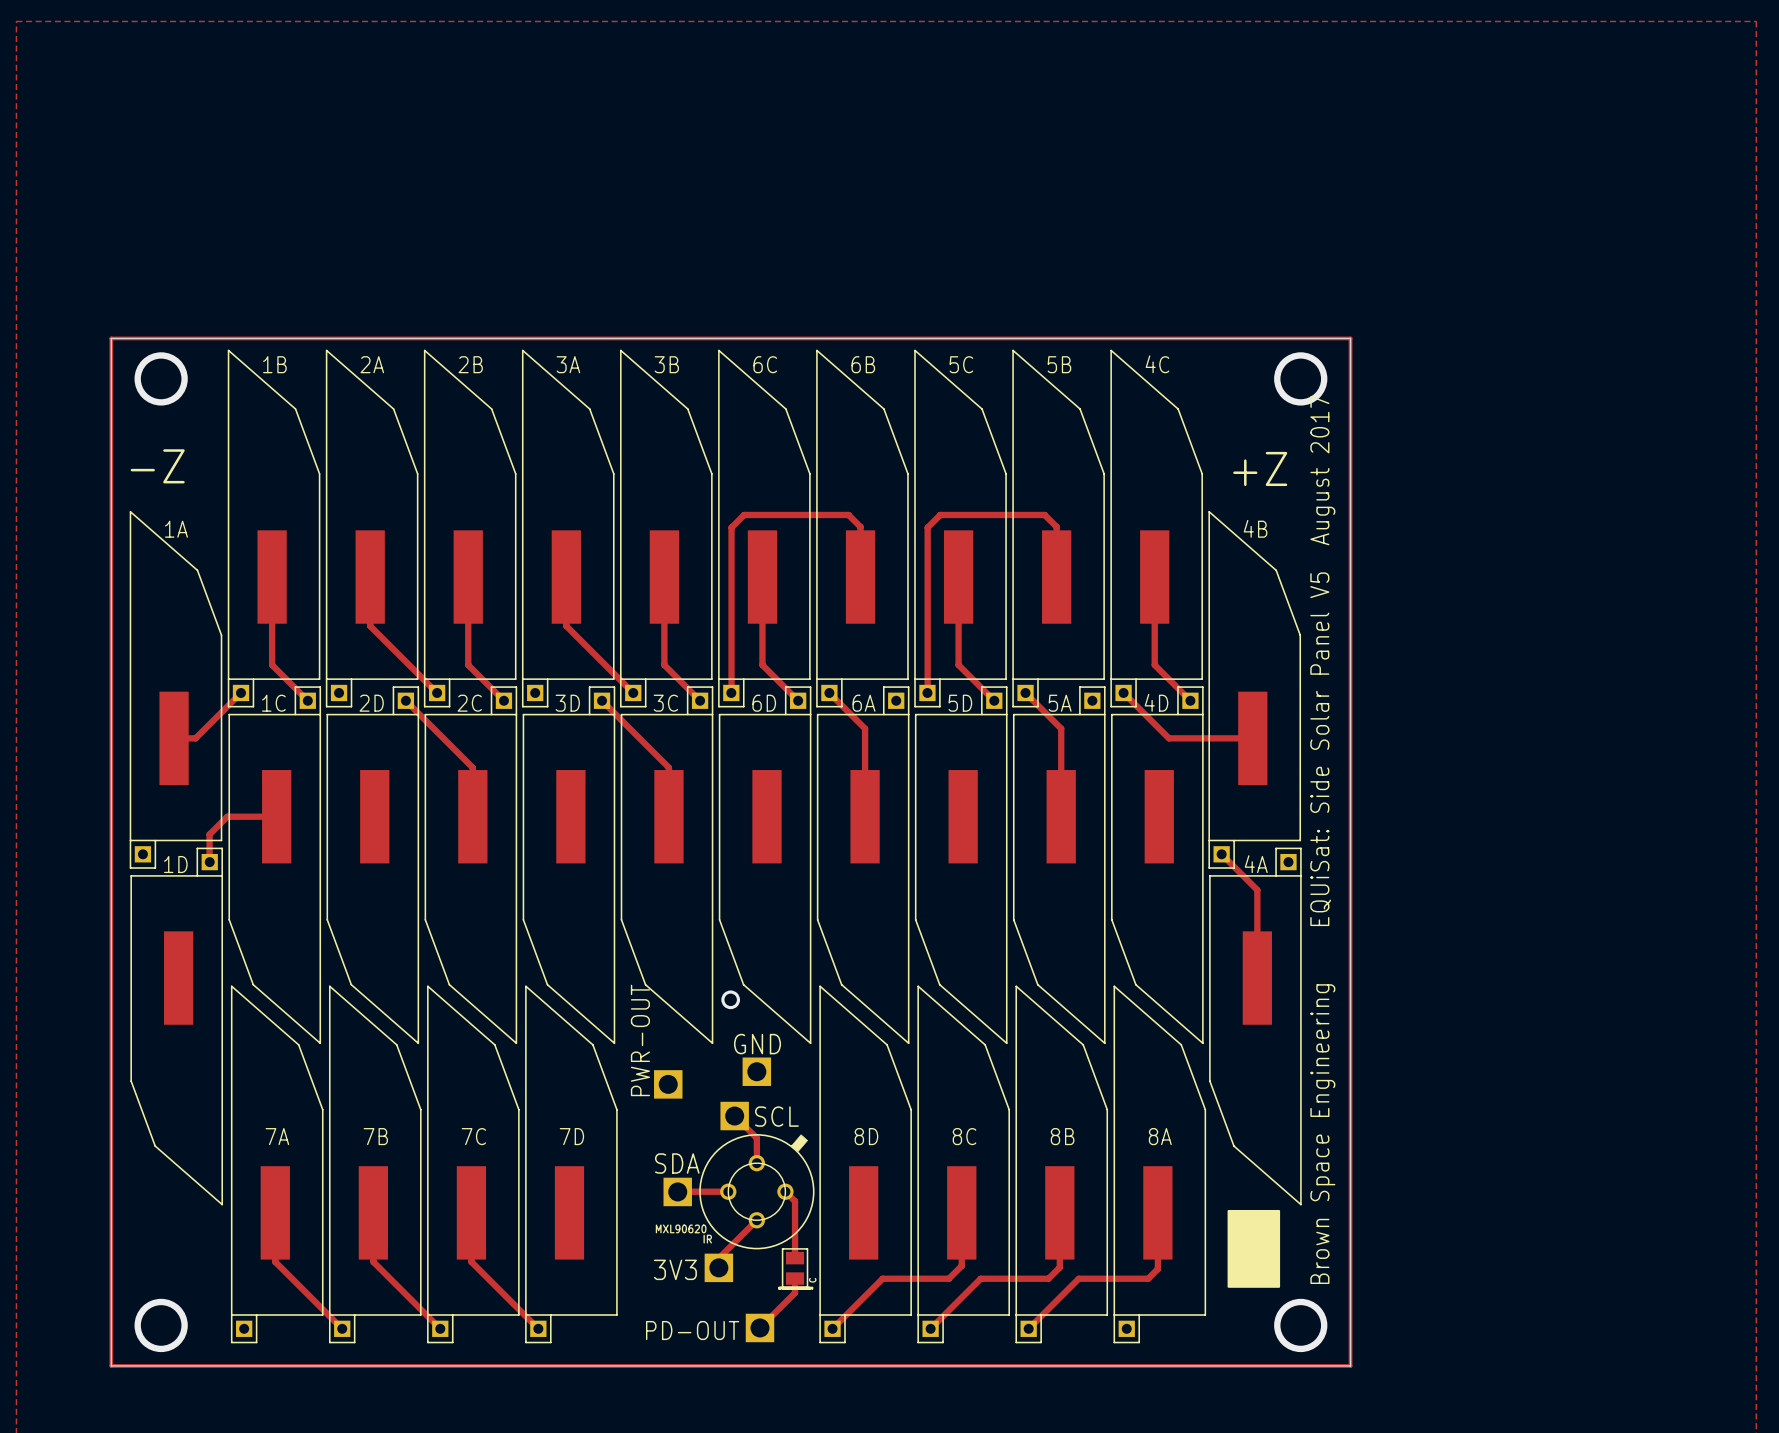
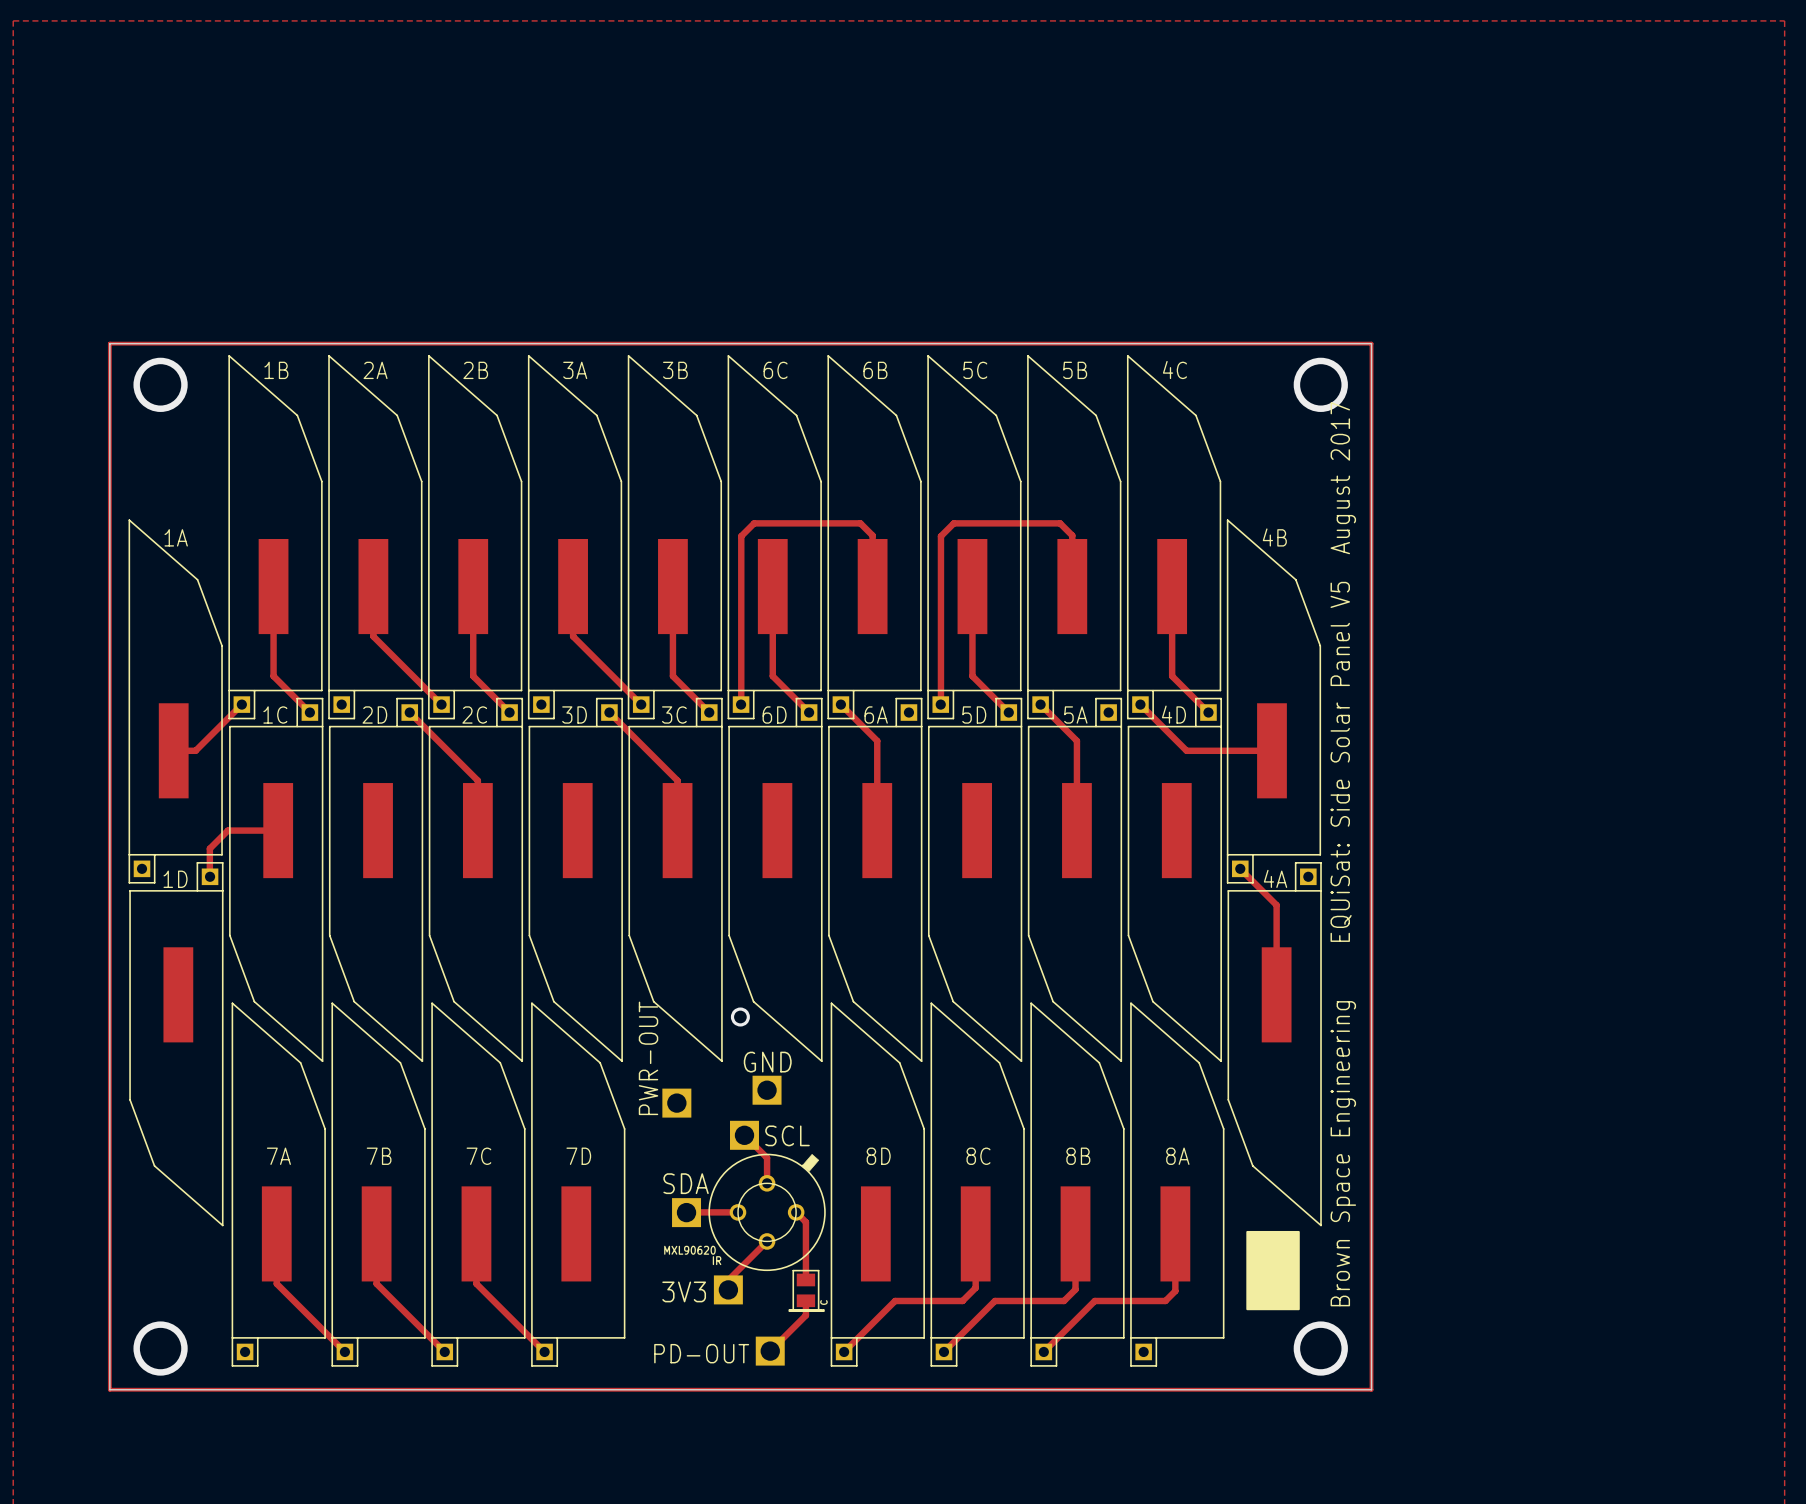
text: -Z (157, 466) -> none
text: +Z (1260, 468) -> none

